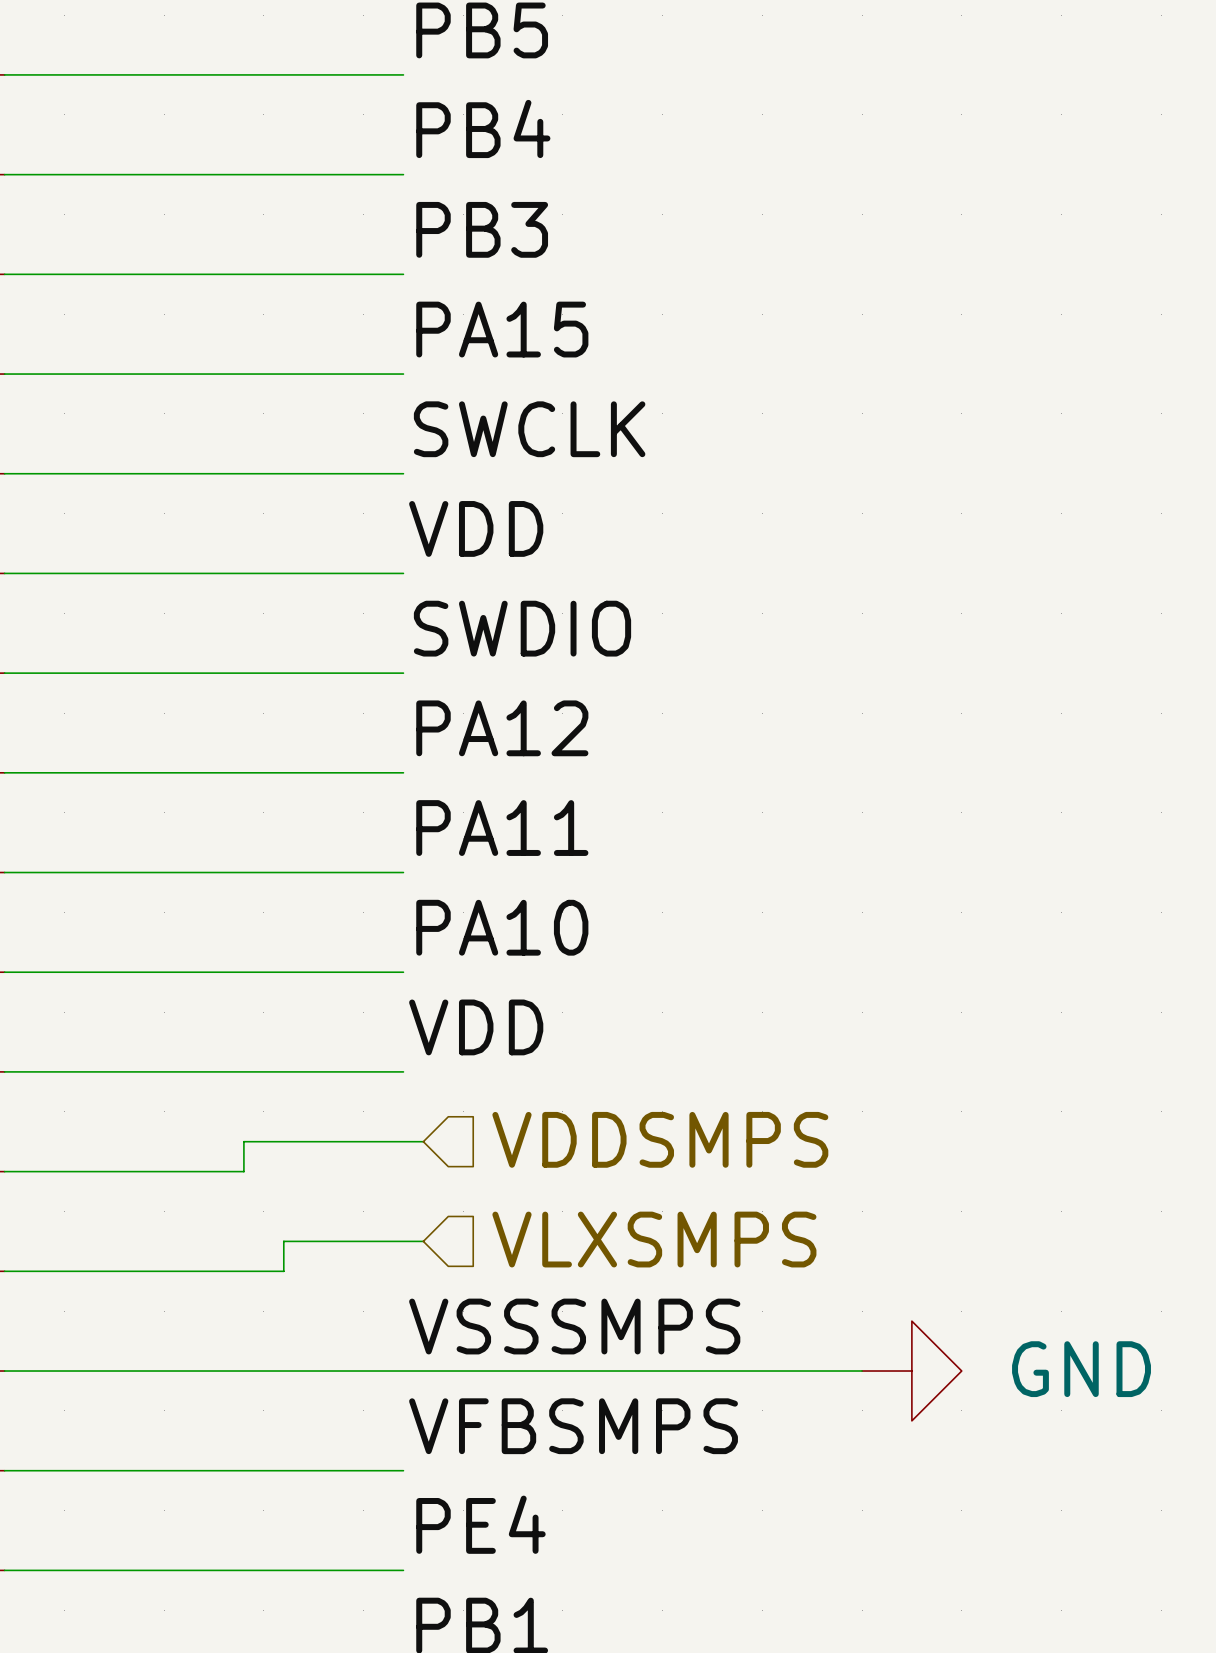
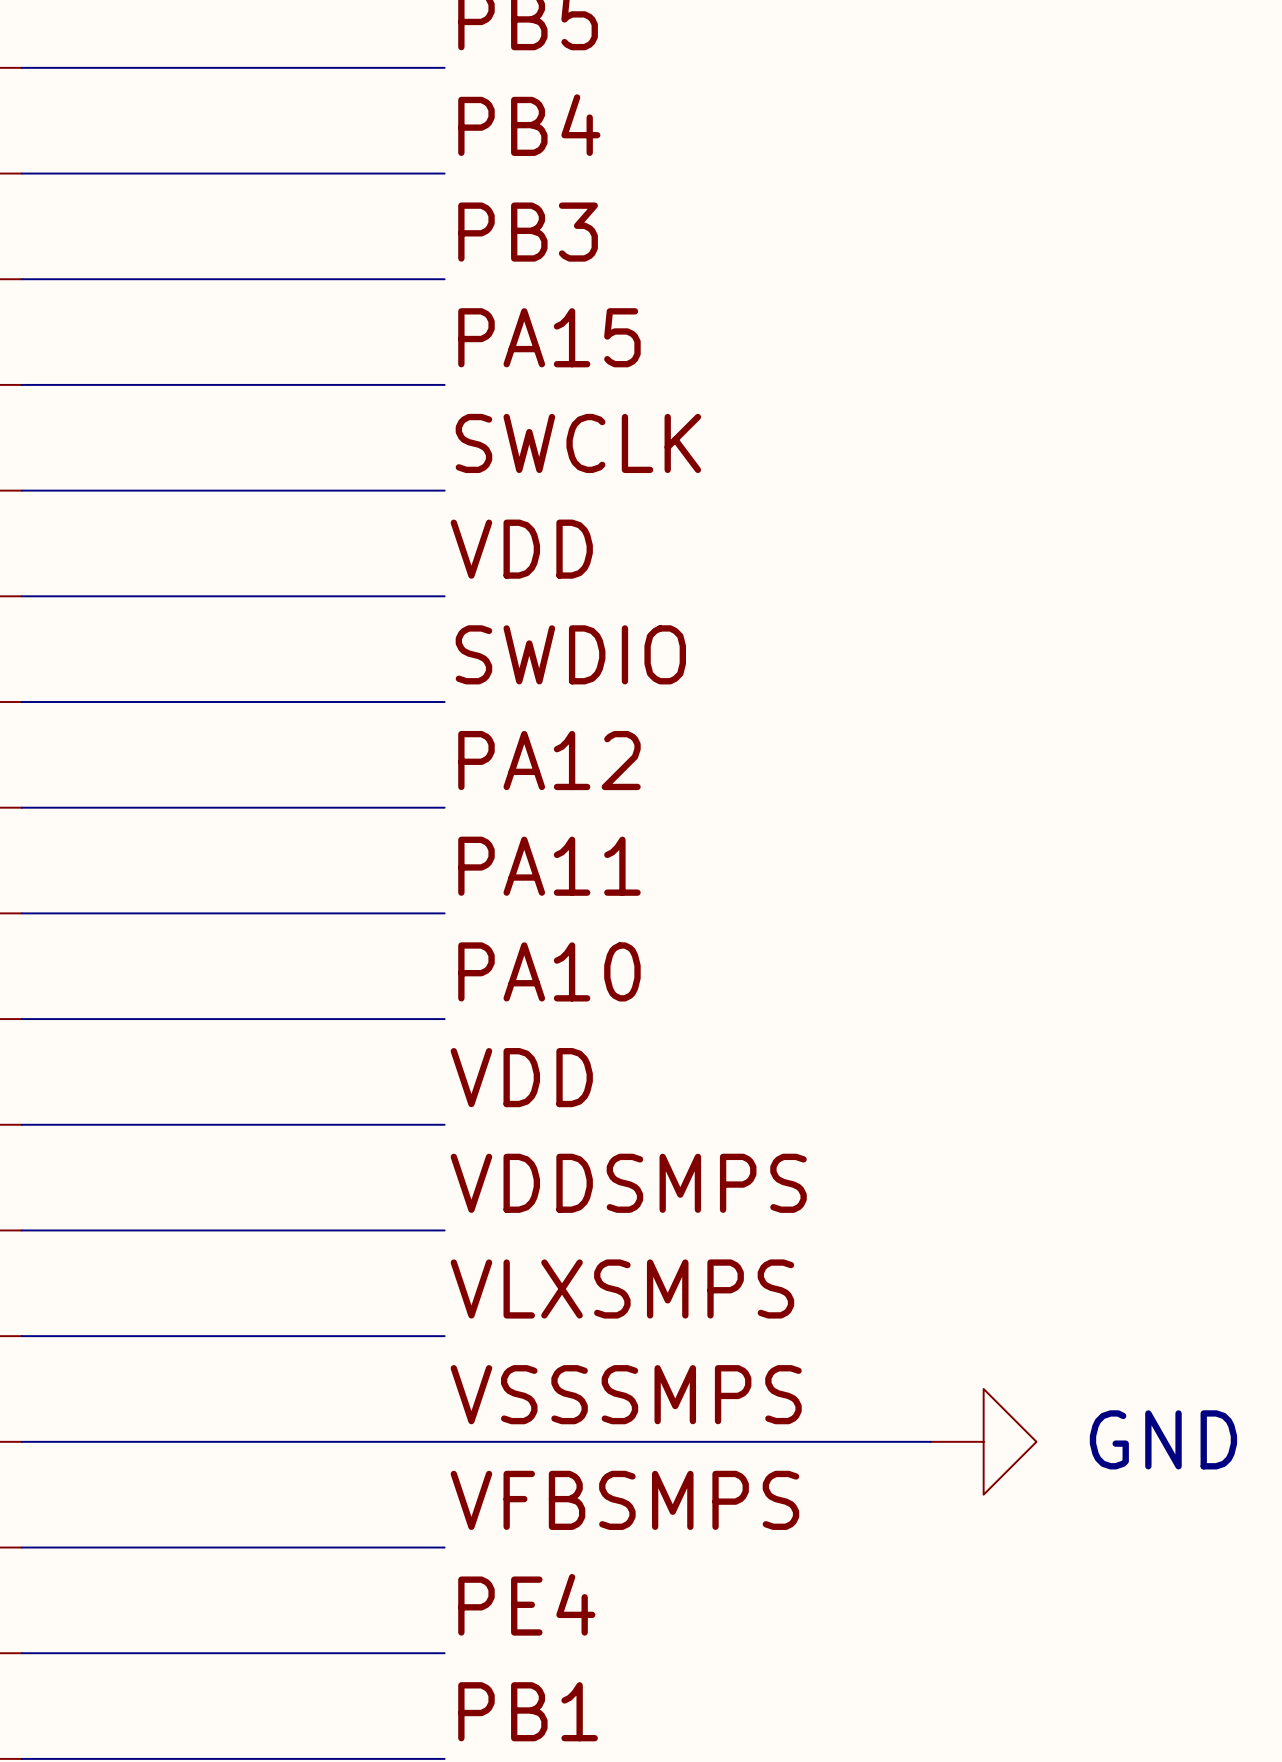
label: none -> VDDSMPS (628, 1183)
hierarchical label: VDDSMPS (660, 1139) -> none
wire: (423, 1141) (243, 1141) (243, 1171) -> (444, 1230) (275, 1230)
label: none -> VLXSMPS (622, 1288)
hierarchical label: VLXSMPS (654, 1239) -> none
wire: (423, 1241) (283, 1241) (283, 1271) -> (444, 1336) (317, 1336)

